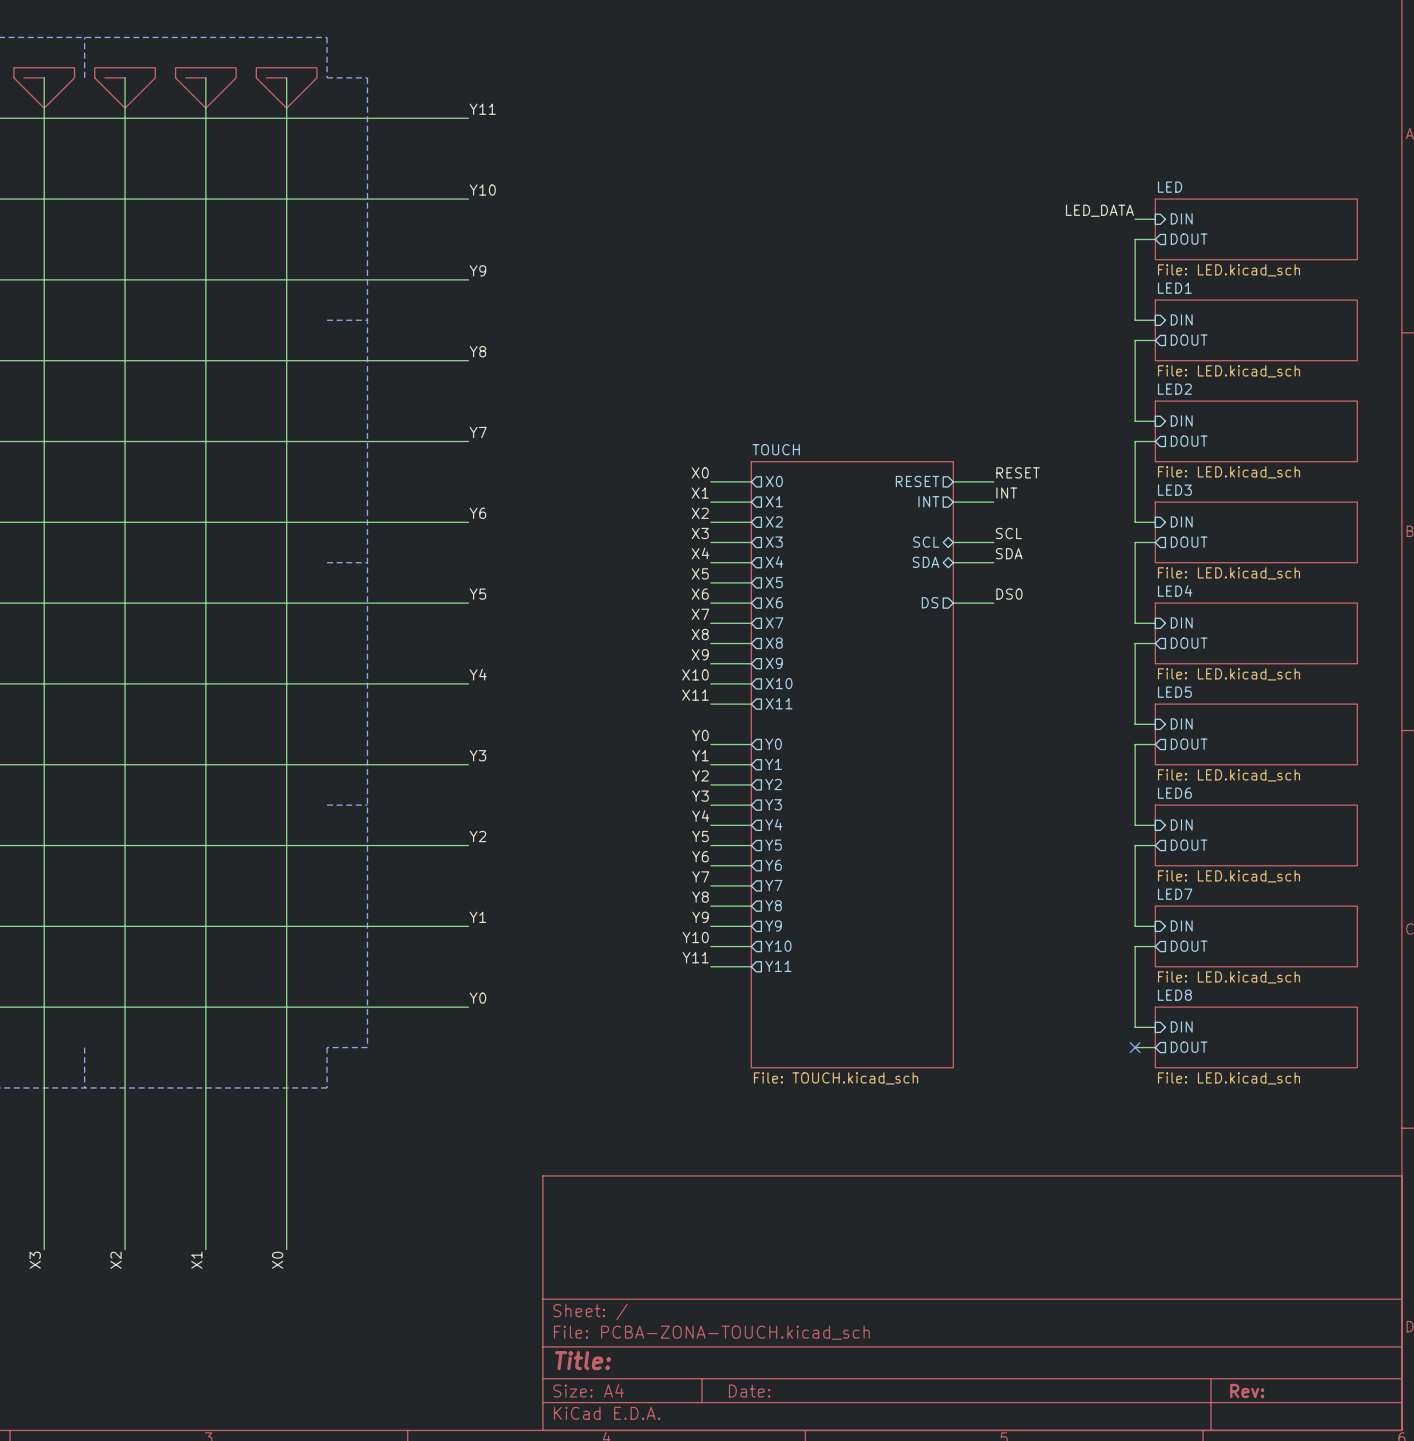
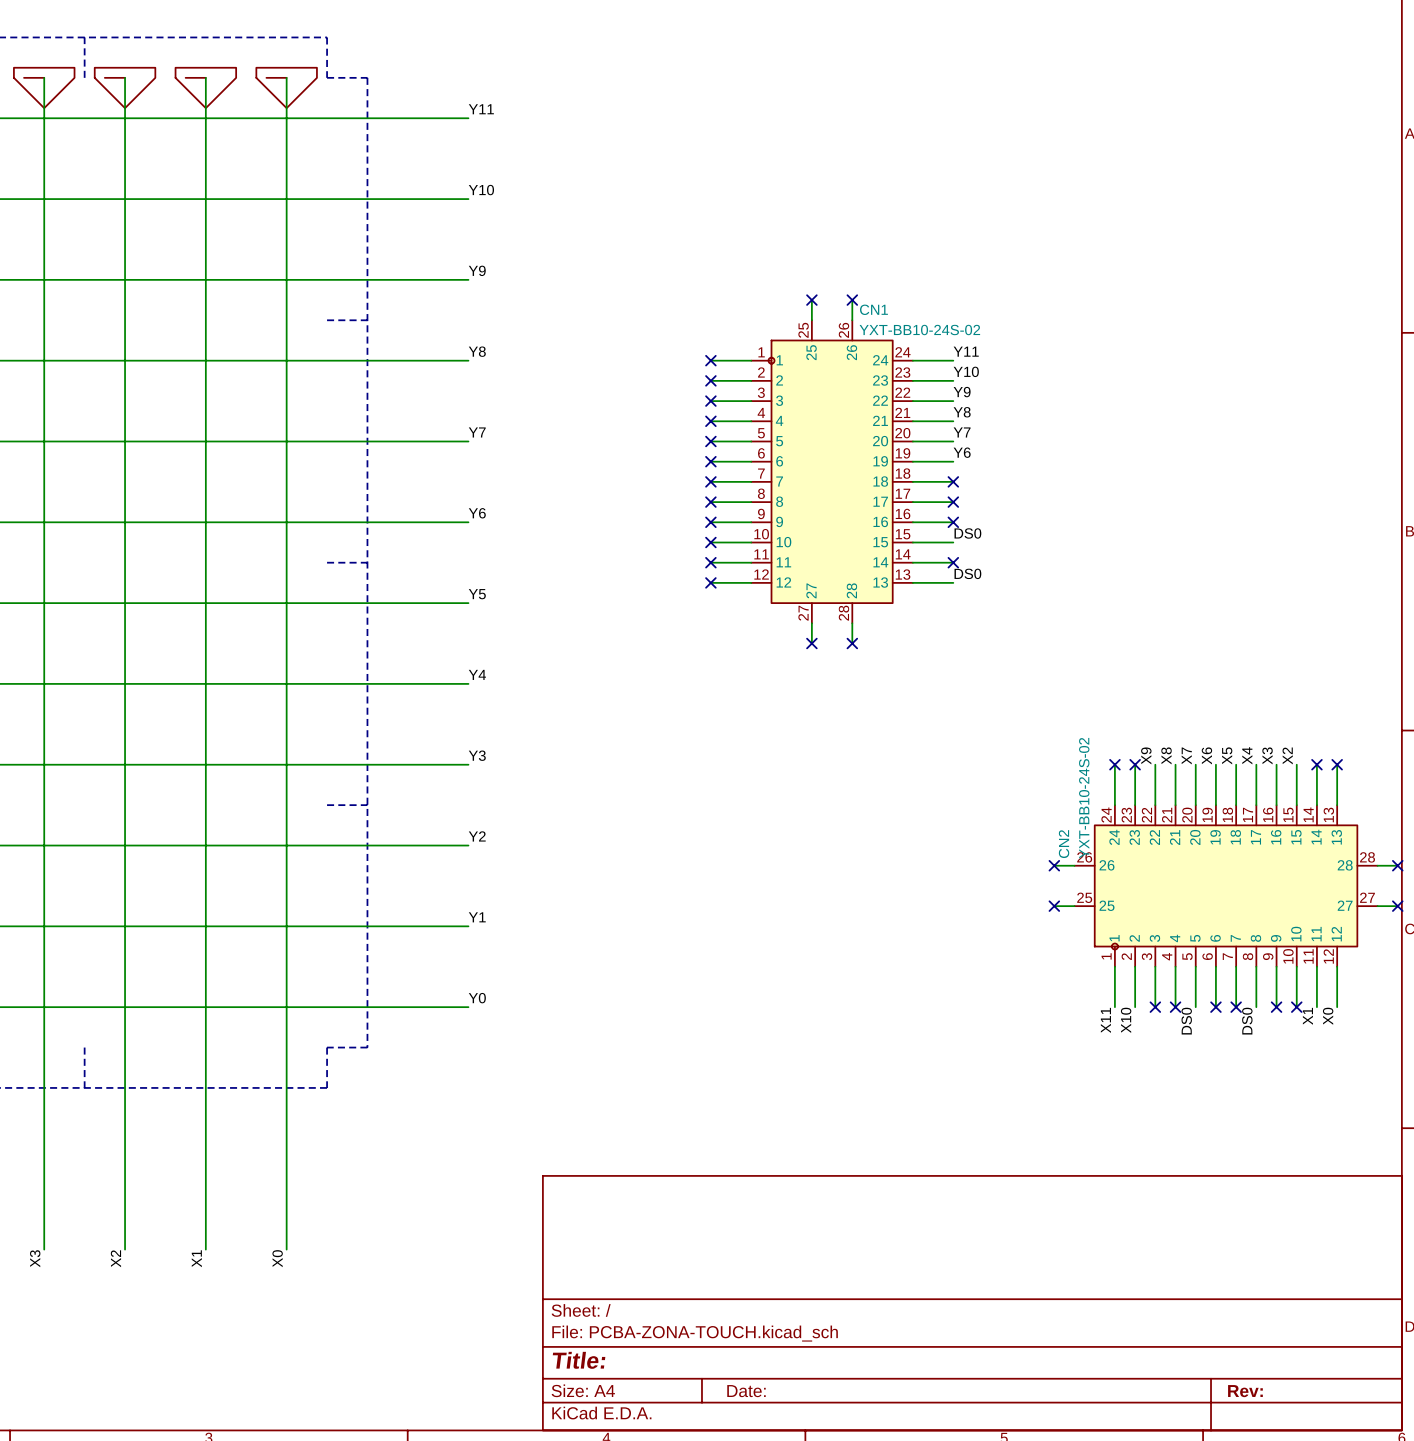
label: LED_DATA (1099, 210) -> none
sheet pin: DIN (1181, 218) -> none
wire: (1135, 219) (1155, 219) -> none
sheet LED: File: LED.kicad_sch (1256, 229) -> none
wire: (1155, 239) (1135, 239) (1135, 320) (1155, 320) -> none
sheet pin: DOUT (1189, 239) -> none
wire: none -> (811, 300) (811, 320)
no-connect mark: none -> (811, 300)
wire: none -> (852, 300) (852, 320)
no-connect mark: none -> (852, 300)
sheet pin: DIN (1181, 319) -> none
sheet LED1: File: LED.kicad_sch (1256, 330) -> none
wire: (1155, 340) (1135, 340) (1135, 421) (1155, 421) -> none
sheet pin: DOUT (1189, 340) -> none
label: none -> Y11 (966, 351)
wire: none -> (710, 360) (751, 360)
no-connect mark: none -> (710, 360)
wire: none -> (912, 360) (953, 360)
label: none -> Y10 (966, 371)
wire: none -> (710, 380) (751, 380)
no-connect mark: none -> (710, 380)
wire: none -> (912, 380) (953, 380)
label: none -> Y9 (962, 392)
wire: none -> (710, 401) (751, 401)
no-connect mark: none -> (710, 401)
wire: none -> (912, 401) (953, 401)
label: none -> Y8 (962, 412)
sheet pin: DIN (1181, 420) -> none
no-connect mark: none -> (710, 421)
wire: none -> (912, 421) (953, 421)
sheet LED2: File: LED.kicad_sch (1256, 431) -> none
label: none -> Y7 (962, 432)
no-connect mark: none -> (710, 441)
wire: none -> (912, 441) (953, 441)
wire: (1155, 441) (1135, 441) (1135, 522) (1155, 522) -> none
sheet pin: DOUT (1189, 441) -> none
label: none -> Y6 (962, 452)
no-connect mark: none -> (710, 461)
CN1: none -> YXT-BB10-24S-02 (832, 471)
label: X0 (700, 472) -> none
label: RESET (1018, 472) -> none
no-connect mark: none -> (710, 481)
sheet pin: X0 (774, 481) -> none
sheet pin: RESET (917, 481) -> none
wire: (953, 481) (993, 481) -> (953, 481) (912, 481)
no-connect mark: none -> (953, 481)
label: X1 (700, 493) -> none
label: INT (1006, 493) -> none
sheet pin: X1 (774, 501) -> none
sheet pin: INT (928, 501) -> none
no-connect mark: none -> (710, 502)
wire: (953, 502) (993, 502) -> (953, 502) (912, 502)
no-connect mark: none -> (953, 502)
label: X2 (700, 513) -> none
sheet pin: X2 (774, 521) -> none
sheet pin: DIN (1181, 521) -> none
no-connect mark: none -> (710, 522)
wire: none -> (912, 522) (953, 522)
no-connect mark: none -> (953, 522)
sheet LED3: File: LED.kicad_sch (1256, 532) -> none
label: X3 (700, 533) -> none
label: none -> DS0 (967, 533)
label: SCL (1008, 533) -> none
no-connect mark: none -> (710, 542)
sheet pin: X3 (774, 542) -> none
sheet pin: SCL (926, 542) -> none
wire: (953, 542) (993, 542) -> (953, 542) (912, 542)
wire: (1155, 542) (1135, 542) (1135, 623) (1155, 623) -> none
sheet pin: DOUT (1189, 542) -> none
label: X4 (700, 553) -> none
label: SDA (1009, 553) -> none
no-connect mark: none -> (710, 562)
sheet pin: X4 (774, 562) -> none
sheet pin: SDA (925, 562) -> none
wire: (953, 562) (993, 562) -> (953, 562) (912, 562)
no-connect mark: none -> (953, 562)
label: X5 (700, 573) -> none
label: none -> DS0 (967, 573)
no-connect mark: none -> (710, 582)
sheet pin: X5 (774, 582) -> none
label: X6 (700, 594) -> none
label: DS0 (1009, 594) -> none
sheet pin: X6 (774, 602) -> none
sheet pin: DS (930, 602) -> none
wire: (710, 603) (751, 603) -> (710, 421) (751, 421)
wire: (953, 603) (993, 603) -> (912, 582) (953, 582)
label: X7 (700, 614) -> none
sheet pin: X7 (774, 622) -> none
sheet pin: DIN (1181, 622) -> none
wire: (710, 623) (751, 623) -> (710, 441) (751, 441)
wire: none -> (811, 623) (811, 643)
wire: none -> (852, 623) (852, 643)
sheet LED4: File: LED.kicad_sch (1256, 633) -> none
label: X8 (700, 634) -> none
wire: (710, 643) (751, 643) -> (710, 461) (751, 461)
sheet pin: X8 (774, 643) -> none
no-connect mark: none -> (811, 643)
no-connect mark: none -> (852, 643)
wire: (1155, 643) (1135, 643) (1135, 724) (1155, 724) -> none
sheet pin: DOUT (1189, 643) -> none
label: X9 (700, 654) -> none
wire: (710, 663) (751, 663) -> none
sheet pin: X9 (774, 663) -> none
label: X10 (695, 674) -> none
wire: (710, 683) (751, 683) -> none
sheet pin: X10 (779, 683) -> none
label: X11 (695, 695) -> none
sheet pin: X11 (779, 703) -> none
wire: (710, 704) (751, 704) -> none
sheet pin: DIN (1181, 723) -> none
sheet LED5: File: LED.kicad_sch (1256, 734) -> none
label: Y0 (700, 735) -> none
wire: (710, 744) (751, 744) -> none
sheet pin: Y0 (773, 744) -> none
wire: (1155, 744) (1135, 744) (1135, 764) -> none
sheet pin: DOUT (1189, 744) -> none
label: none -> X9 (1146, 755)
label: none -> X8 (1166, 755)
label: none -> X7 (1186, 755)
label: none -> X6 (1206, 755)
label: none -> X5 (1227, 755)
label: none -> X4 (1247, 755)
label: none -> X3 (1267, 755)
label: none -> X2 (1287, 755)
label: Y1 (700, 755) -> none
wire: (710, 764) (751, 764) -> none
sheet pin: Y1 (773, 764) -> none
sheet TOUCH: File: TOUCH.kicad_sch (852, 764) -> none
wire: none -> (1114, 764) (1114, 805)
no-connect mark: none -> (1114, 764)
no-connect mark: none -> (1135, 764)
wire: none -> (1155, 764) (1155, 805)
wire: none -> (1175, 764) (1175, 805)
wire: none -> (1195, 764) (1195, 805)
wire: none -> (1215, 764) (1215, 805)
wire: none -> (1236, 764) (1236, 805)
wire: none -> (1256, 764) (1256, 805)
wire: none -> (1276, 764) (1276, 805)
wire: none -> (1296, 764) (1296, 805)
wire: none -> (1316, 764) (1316, 805)
no-connect mark: none -> (1316, 764)
wire: none -> (1337, 764) (1337, 805)
no-connect mark: none -> (1337, 764)
label: Y2 (700, 775) -> none
wire: (710, 784) (751, 784) -> none
sheet pin: Y2 (773, 784) -> none
label: Y3 (700, 796) -> none
sheet pin: Y3 (773, 804) -> none
wire: (710, 805) (751, 805) -> none
label: Y4 (700, 816) -> none
sheet pin: Y4 (773, 824) -> none
sheet pin: DIN (1181, 824) -> none
wire: (710, 825) (751, 825) -> none
sheet LED6: File: LED.kicad_sch (1256, 835) -> none
label: Y5 (700, 836) -> none
wire: (710, 845) (751, 845) -> none
sheet pin: Y5 (773, 845) -> none
sheet pin: DOUT (1189, 845) -> none
label: Y6 (700, 856) -> none
wire: (710, 865) (751, 865) -> none
sheet pin: Y6 (773, 865) -> none
wire: none -> (1054, 865) (1074, 865)
no-connect mark: none -> (1054, 865)
wire: none -> (1377, 865) (1397, 865)
no-connect mark: none -> (1397, 865)
label: Y7 (700, 876) -> none
wire: (710, 885) (751, 885) -> none
sheet pin: Y7 (773, 885) -> none
CN2: none -> YXT-BB10-24S-02 (1226, 885)
label: Y8 (700, 897) -> none
sheet pin: Y8 (773, 905) -> none
wire: (710, 906) (751, 906) -> none
no-connect mark: none -> (1054, 906)
wire: none -> (1377, 906) (1397, 906)
no-connect mark: none -> (1397, 906)
label: Y9 (700, 917) -> none
sheet pin: Y9 (773, 925) -> none
sheet pin: DIN (1181, 925) -> none
wire: (710, 926) (751, 926) -> none
sheet LED7: File: LED.kicad_sch (1256, 936) -> none
label: Y10 (695, 937) -> none
wire: (710, 946) (751, 946) -> none
sheet pin: Y10 (778, 946) -> none
sheet pin: DOUT (1189, 946) -> none
label: Y11 (695, 957) -> none
wire: (710, 966) (751, 966) -> none
sheet pin: Y11 (778, 966) -> none
wire: none -> (1114, 966) (1114, 1007)
wire: none -> (1155, 966) (1155, 1007)
wire: none -> (1175, 966) (1175, 1007)
wire: none -> (1195, 966) (1195, 1007)
wire: none -> (1215, 966) (1215, 1007)
wire: none -> (1236, 966) (1236, 1007)
wire: none -> (1256, 966) (1256, 1007)
wire: none -> (1276, 966) (1276, 1007)
wire: none -> (1296, 966) (1296, 1007)
wire: none -> (1316, 966) (1316, 1007)
wire: none -> (1337, 966) (1337, 1007)
wire: (1135, 1007) (1135, 1027) (1155, 1027) -> none
no-connect mark: none -> (1155, 1007)
no-connect mark: none -> (1175, 1007)
no-connect mark: none -> (1215, 1007)
no-connect mark: none -> (1236, 1007)
no-connect mark: none -> (1276, 1007)
no-connect mark: none -> (1296, 1007)
label: none -> X1 (1307, 1016)
label: none -> X0 (1328, 1016)
label: none -> X11 (1105, 1020)
label: none -> X10 (1126, 1020)
label: none -> DS0 (1186, 1021)
label: none -> DS0 (1247, 1021)
sheet pin: DIN (1181, 1026) -> none
sheet LED8: File: LED.kicad_sch (1256, 1037) -> none
wire: (1135, 1047) (1155, 1047) -> (1054, 906) (1074, 906)
no-connect mark: (1135, 1047) -> none
sheet pin: DOUT (1189, 1047) -> none

